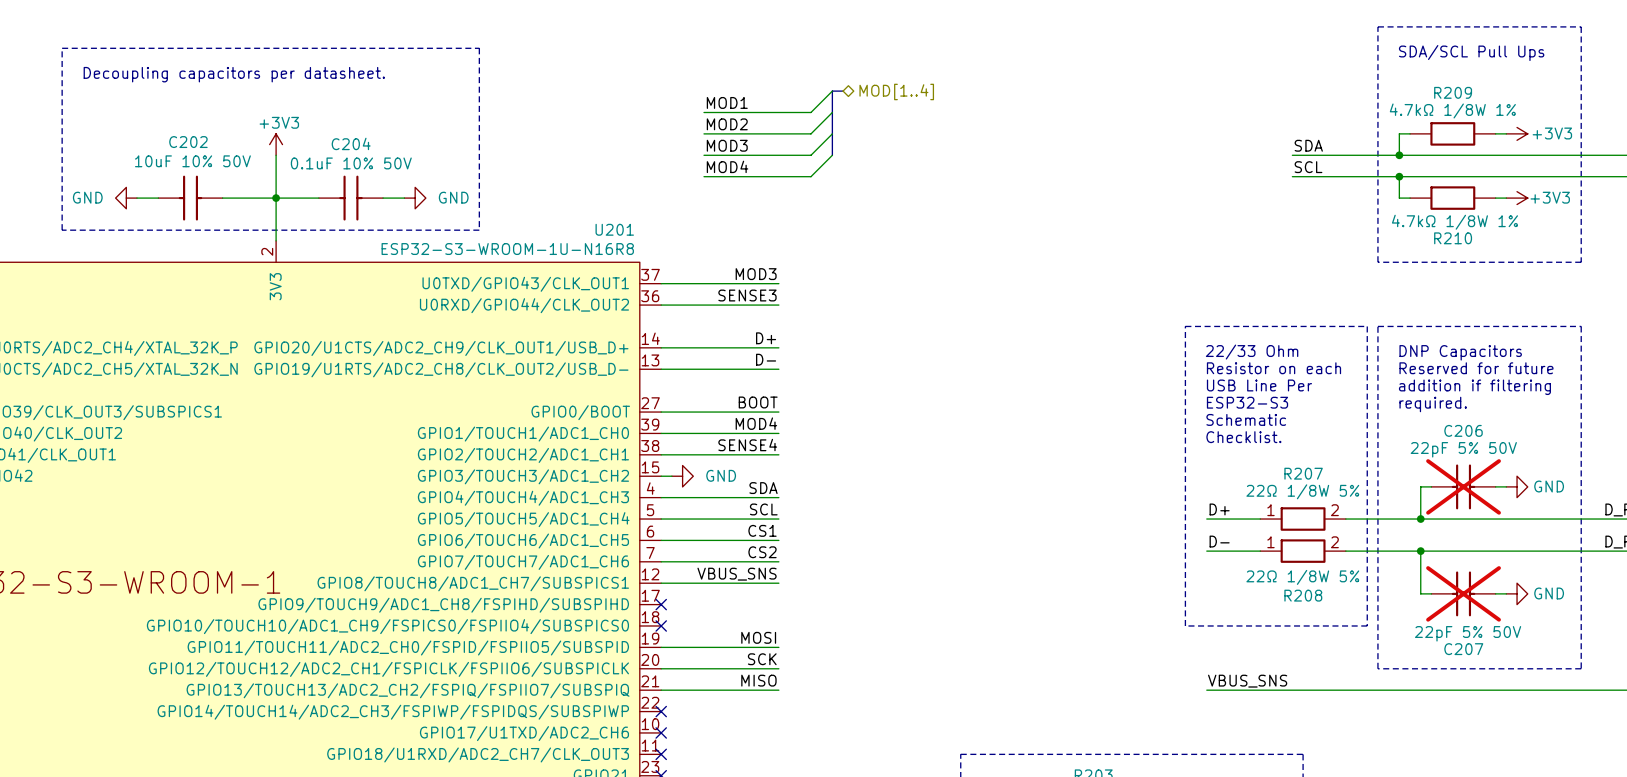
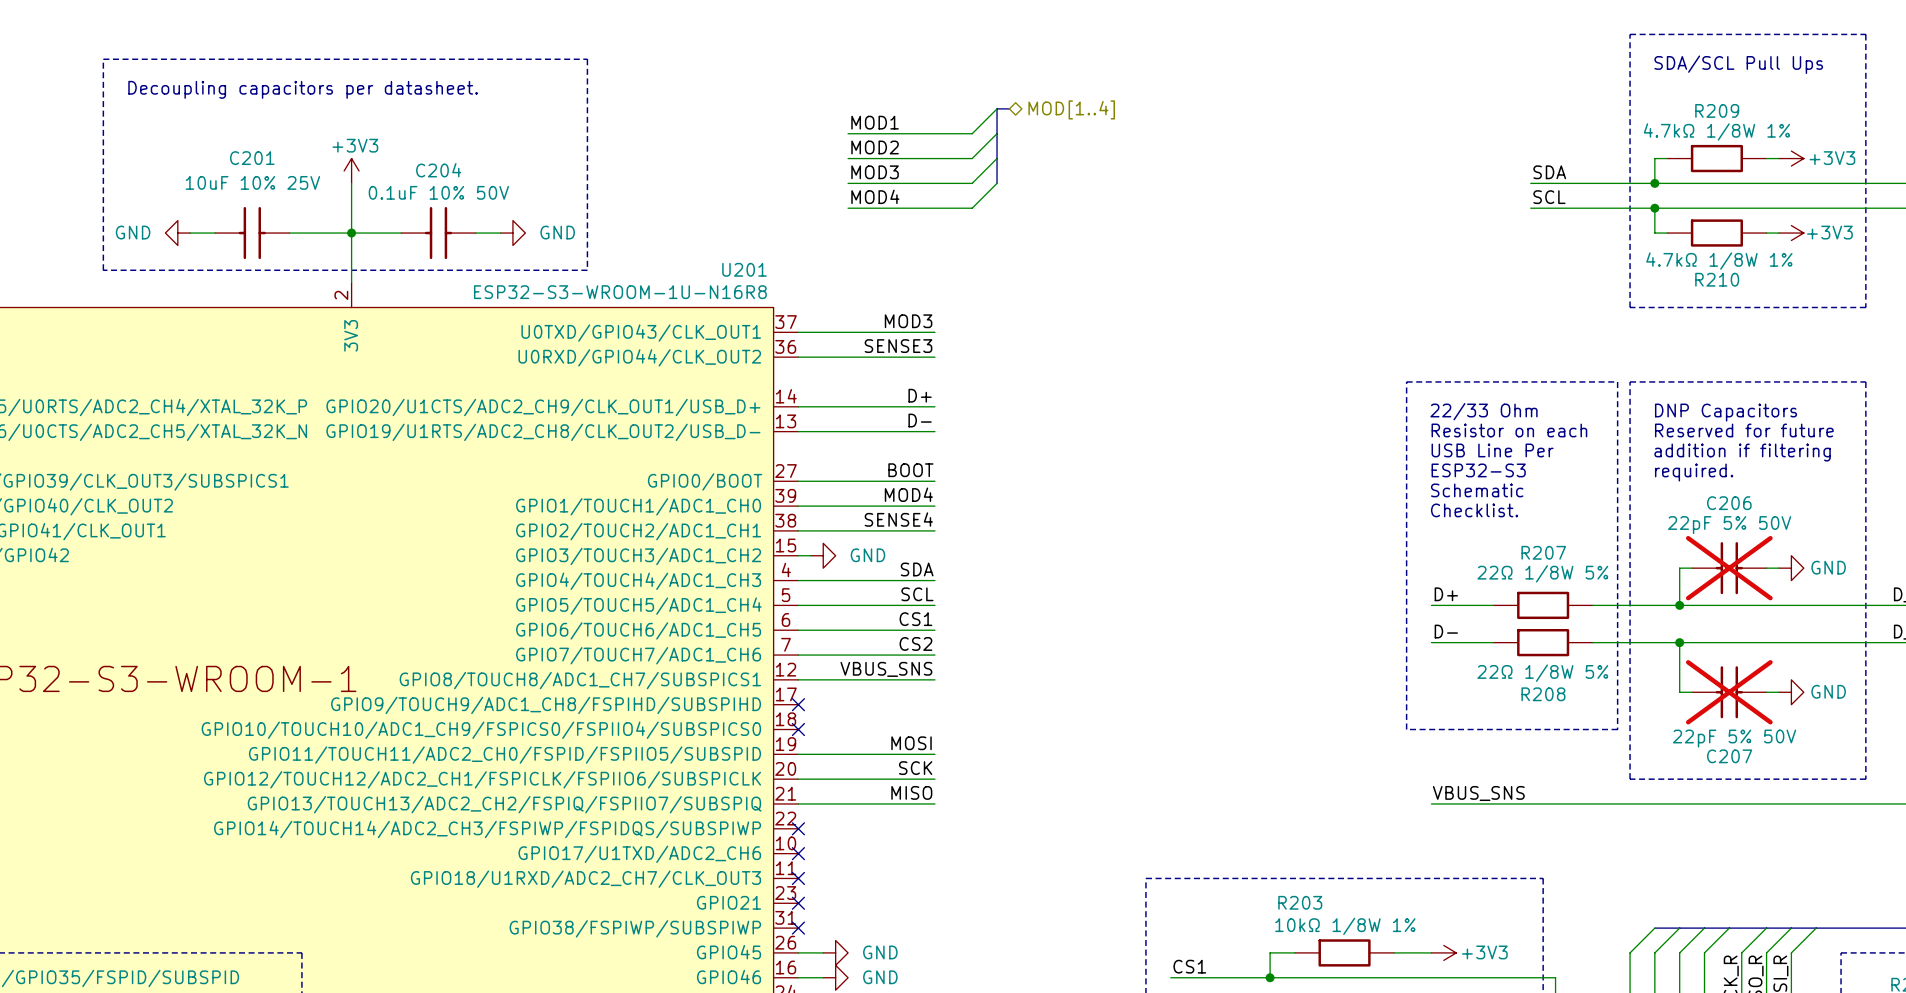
C202 name: C202 (188, 142) -> C201 (252, 158)
C202 value: 10uF 10% 50V (192, 161) -> 10uF 10% 25V (252, 182)
R207 pin number: 1 (1270, 510) -> none
R207 pin number: 2 (1334, 510) -> none
R208 pin number: 1 (1270, 542) -> none
R208 pin number: 2 (1334, 542) -> none

